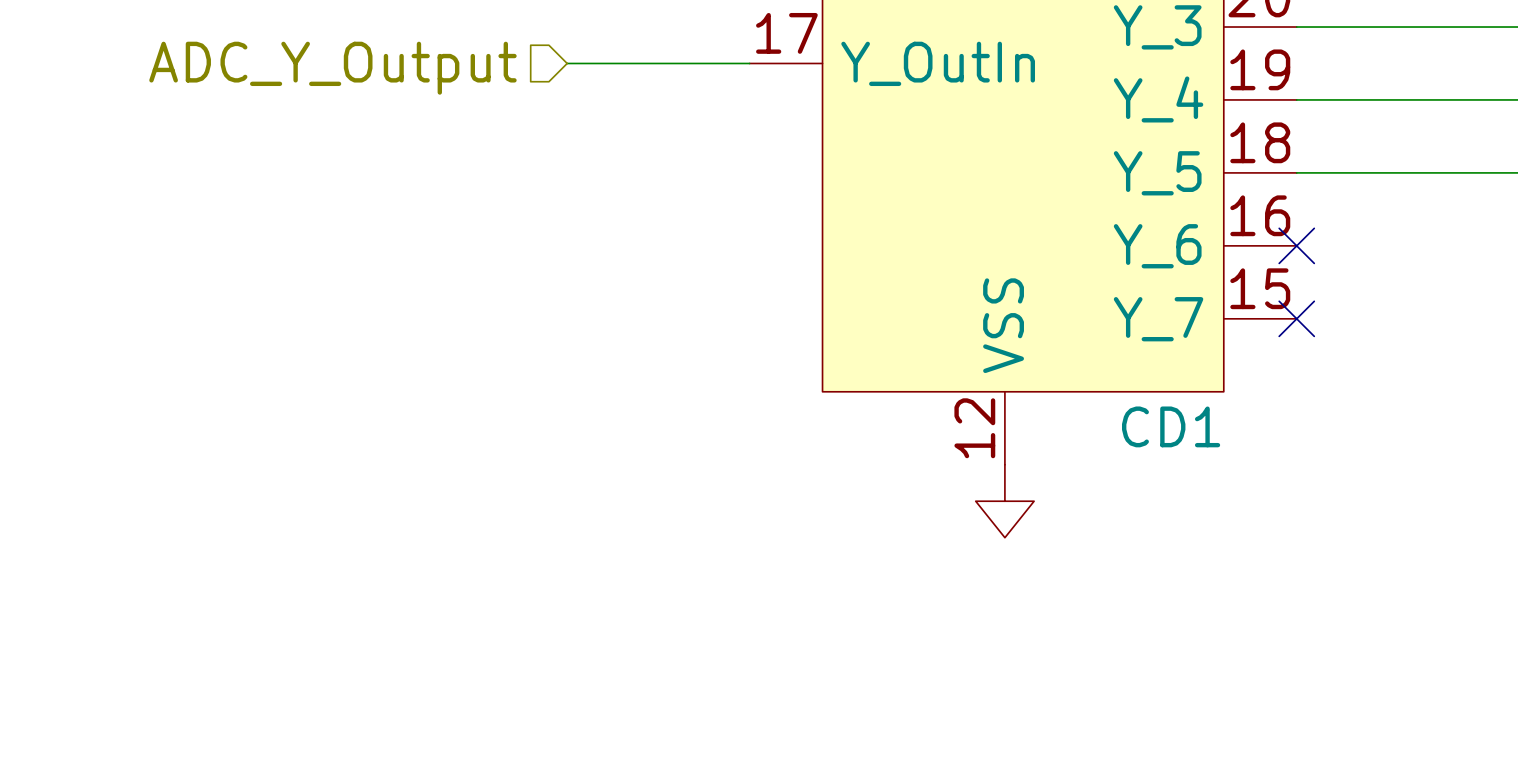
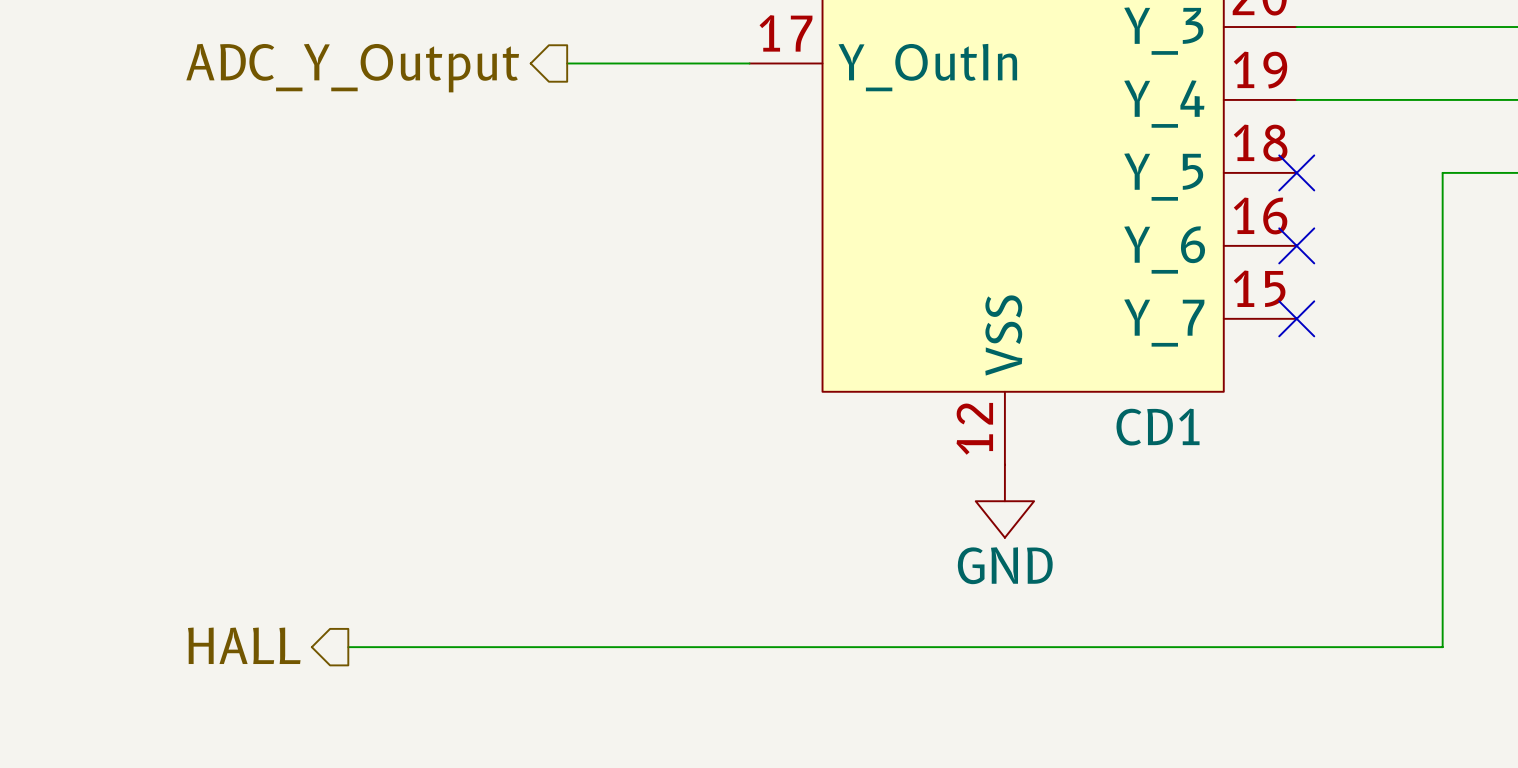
hierarchical label shape: input (332, 68) -> output (352, 68)
wire: (1296, 172) (1442, 172) -> (348, 647) (1442, 647) (1442, 172)
no-connect mark: none -> (1296, 172)
power symbol shape: [975, 464, 1035, 538] -> [975, 464, 1035, 538]
power symbol text: none -> GND (1005, 565)
hierarchical label: none -> HALL (244, 645)

